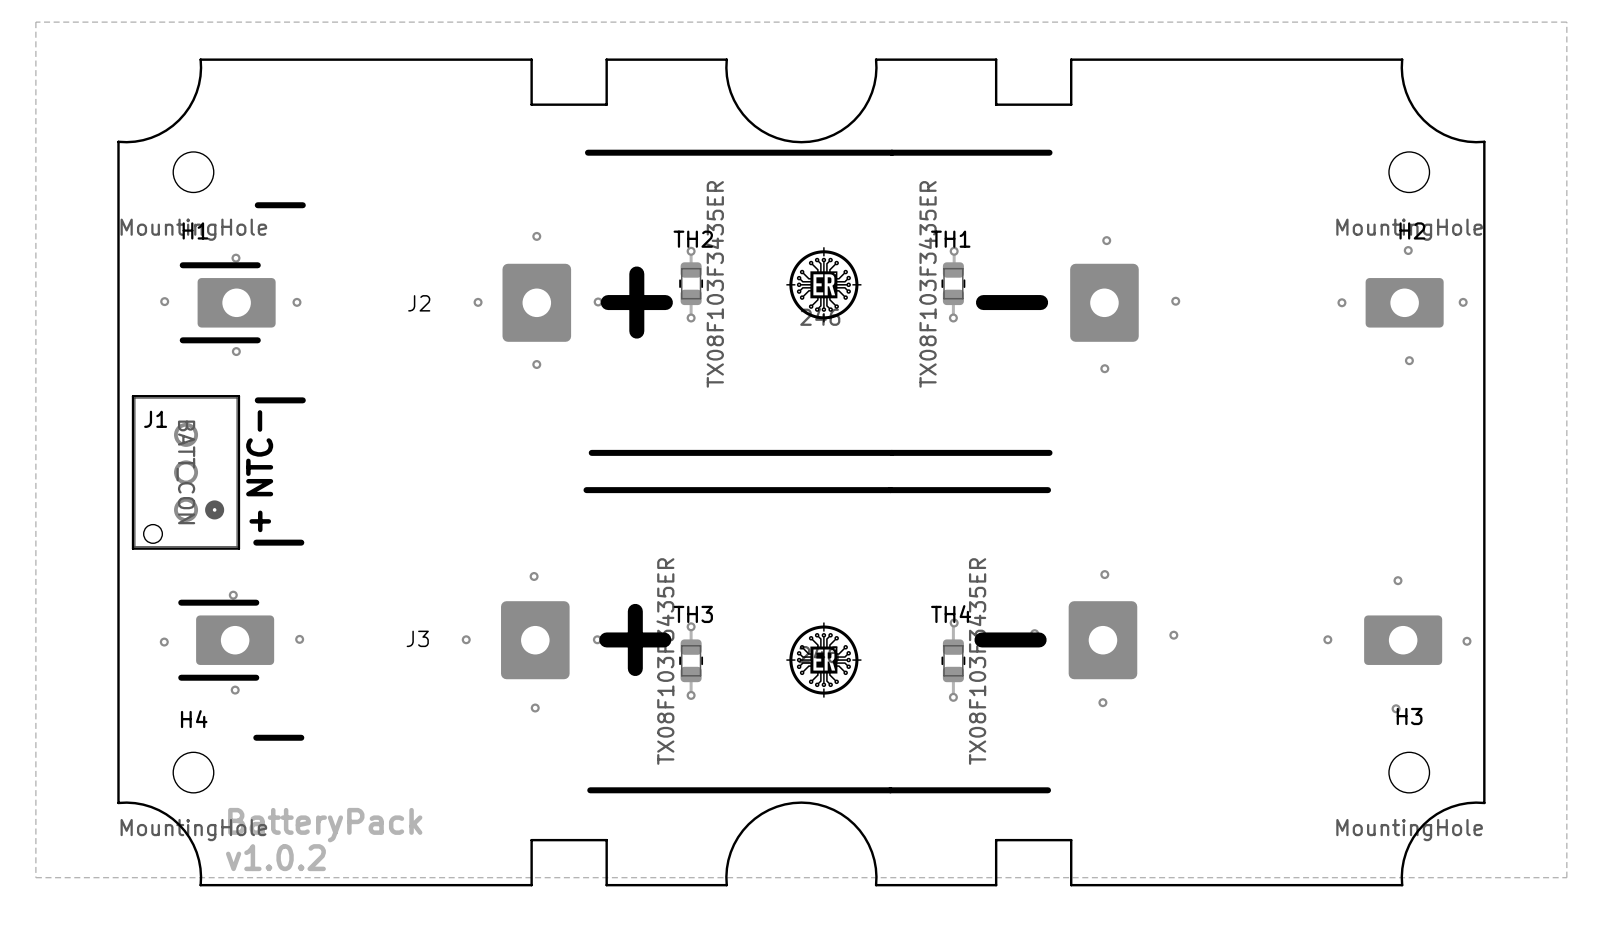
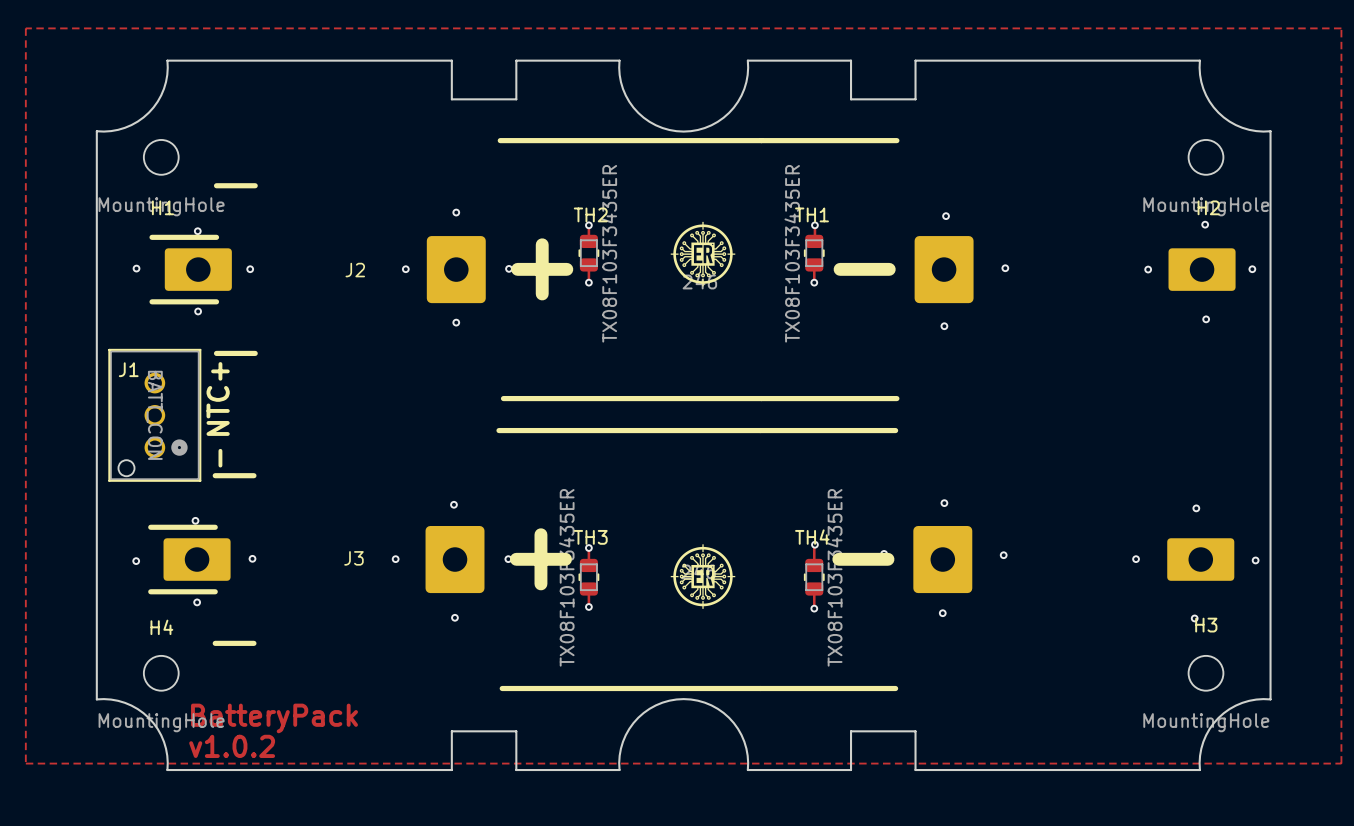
text position: - (259, 420) -> - (220, 458)
text position: + (260, 521) -> + (220, 371)

